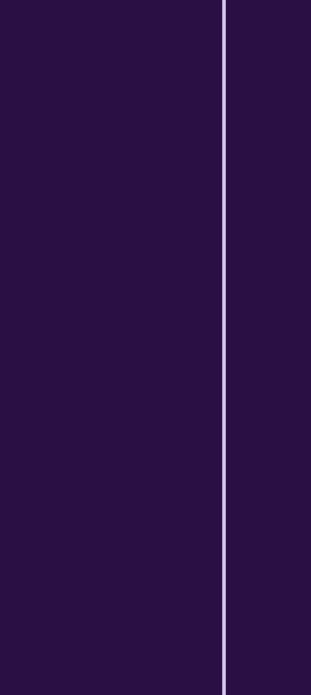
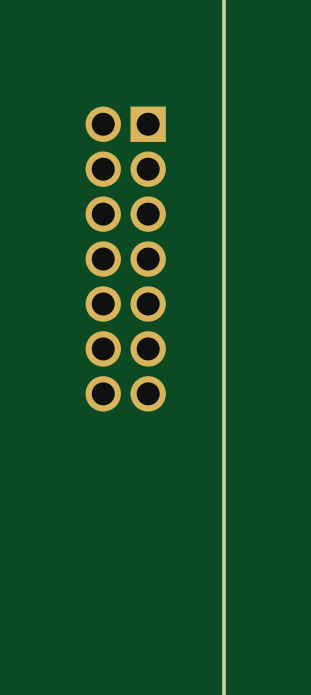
part: none -> (125, 259)

